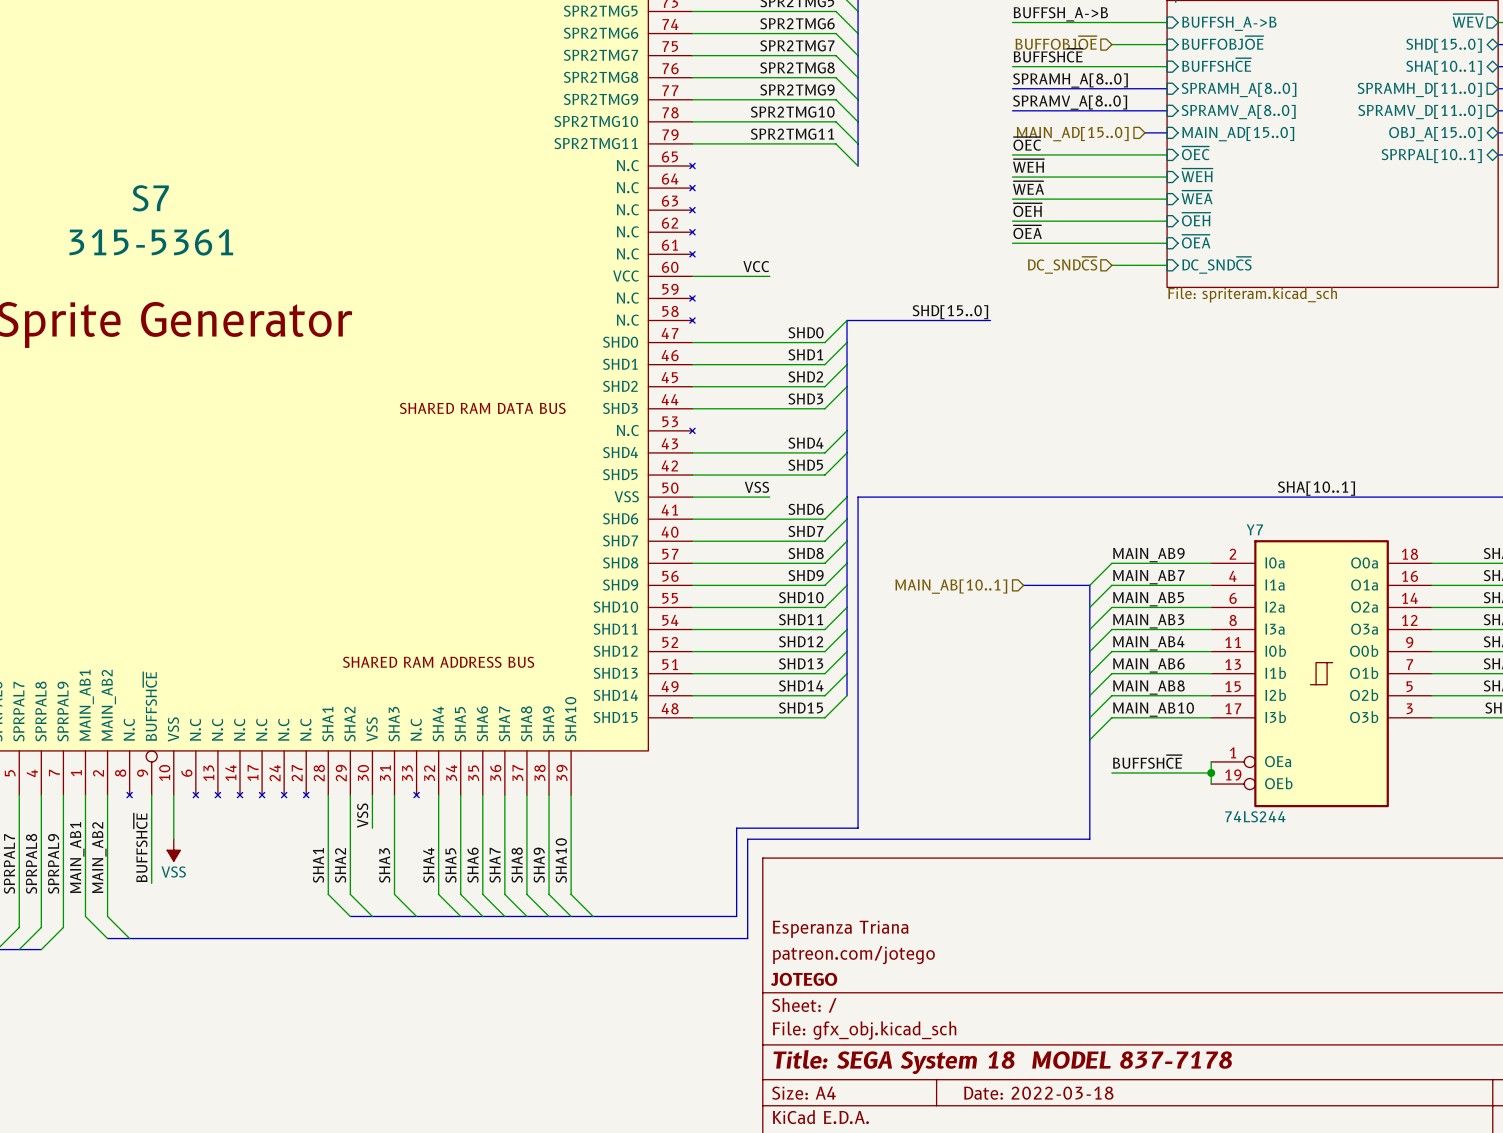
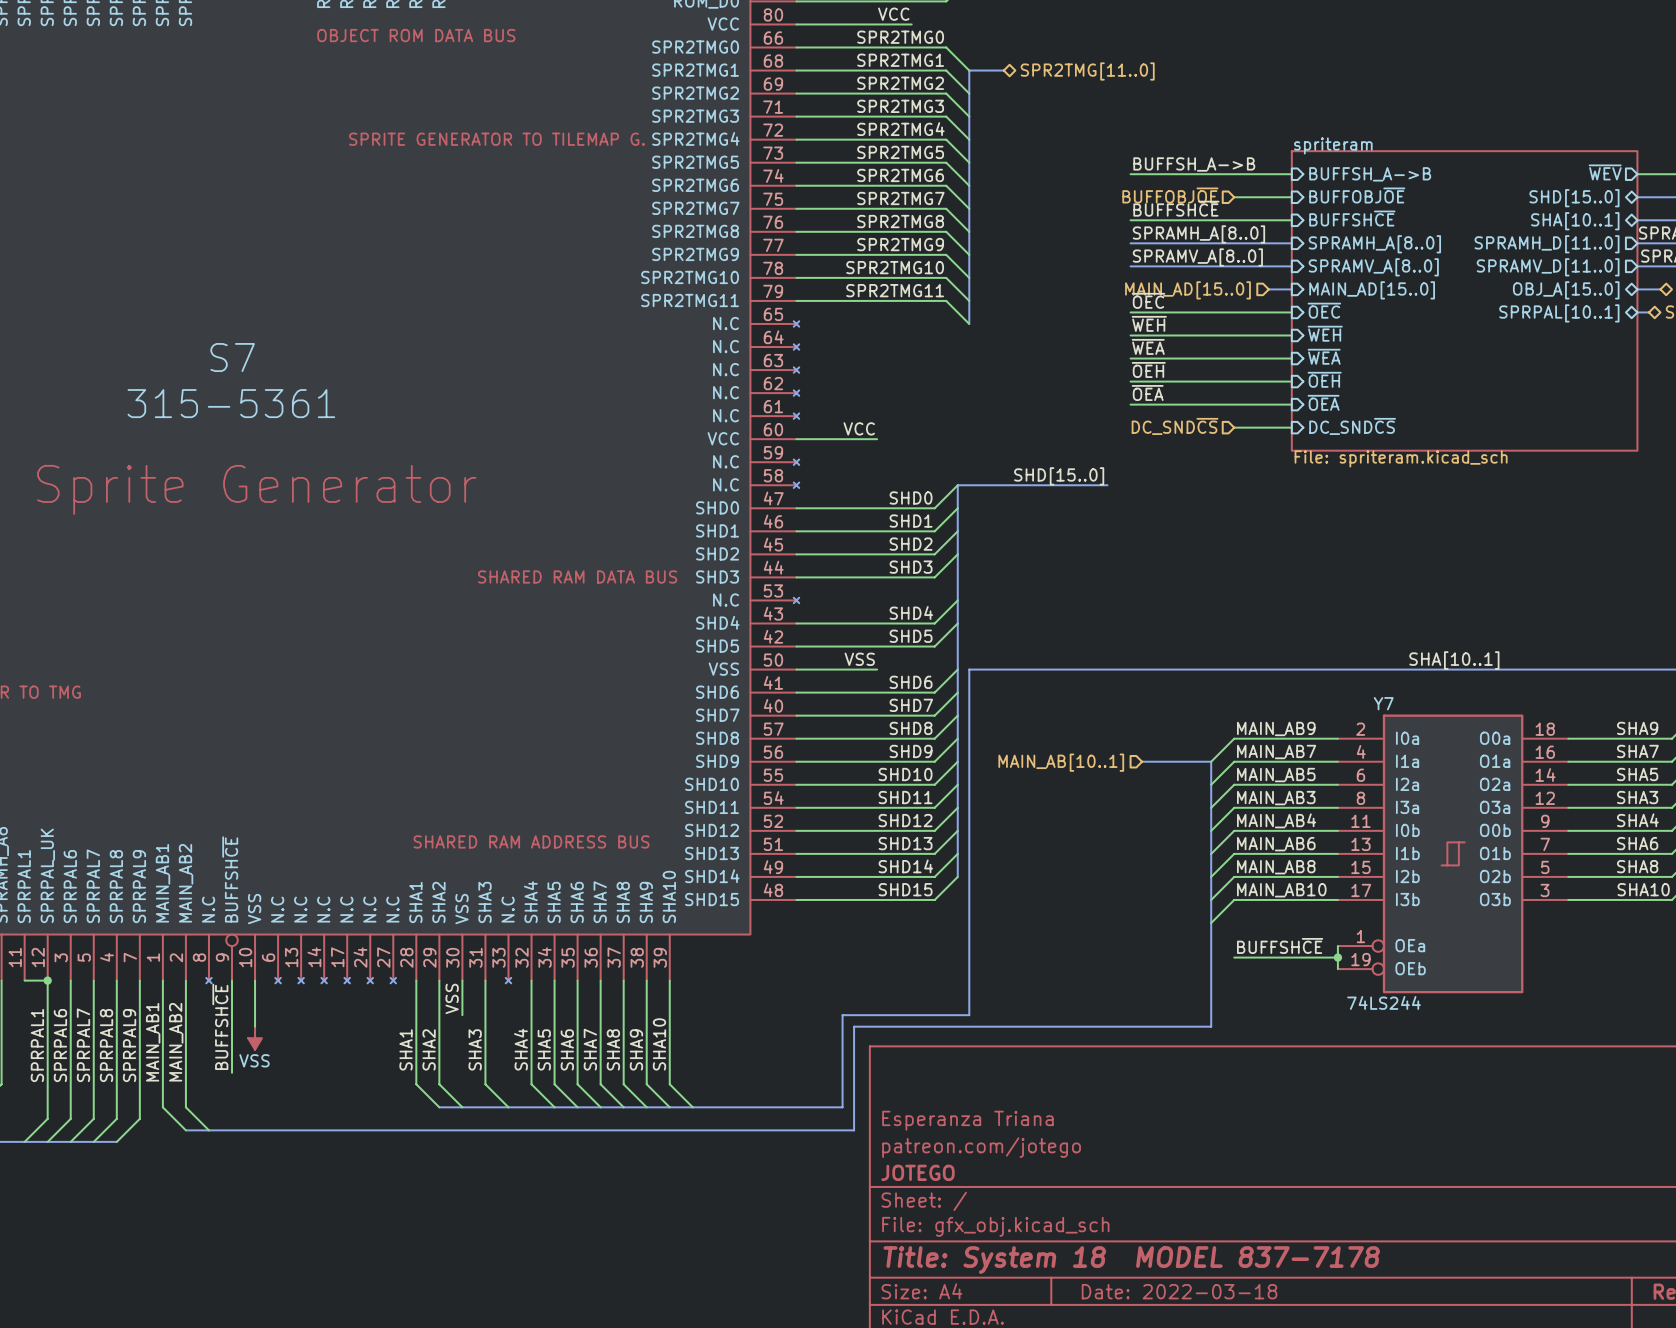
title block: Title: SEGA System 18 MODEL 837-7178 (1002, 1062) -> Title: System 18 MODEL 837-7178 (1131, 1260)

